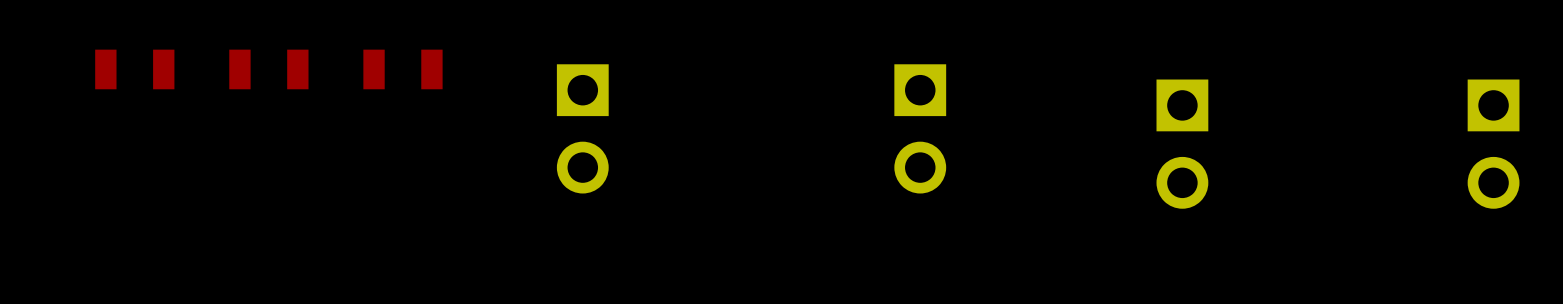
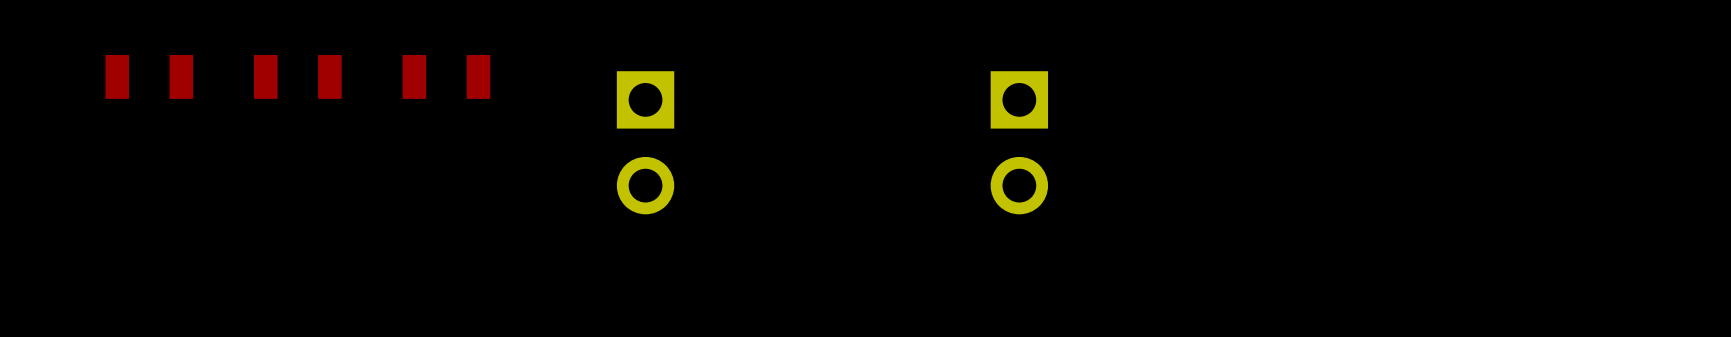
part: (1182, 144) -> none
part: (1493, 144) -> none

